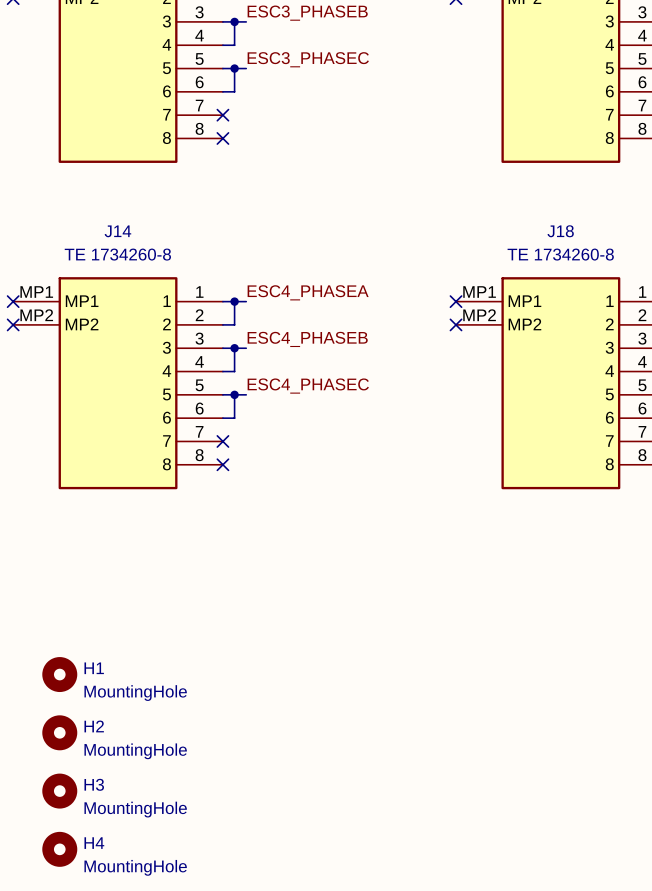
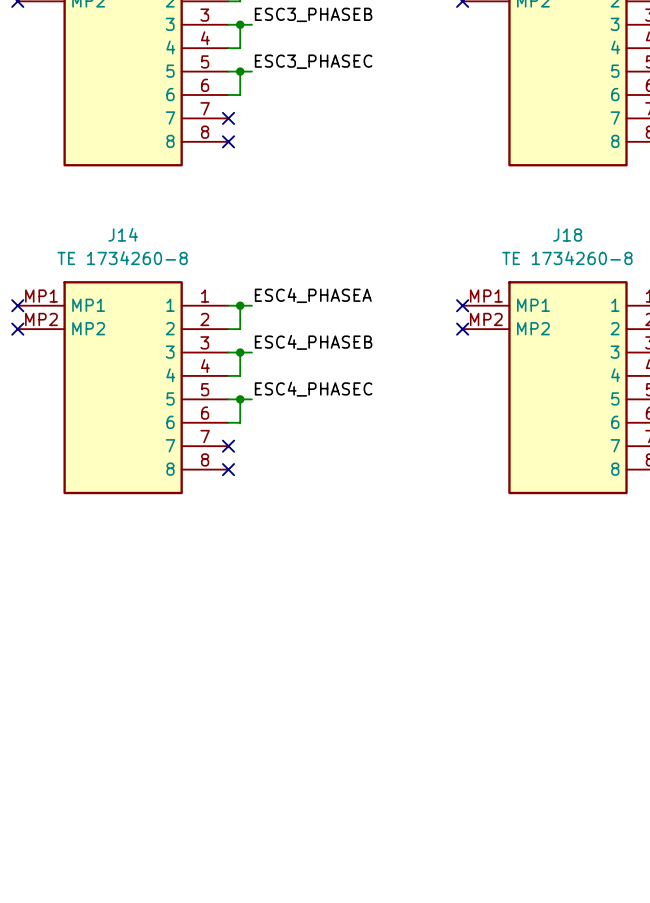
H1: MountingHole (59, 674) -> none
H2: MountingHole (59, 732) -> none
H3: MountingHole (59, 791) -> none
H4: MountingHole (59, 849) -> none

